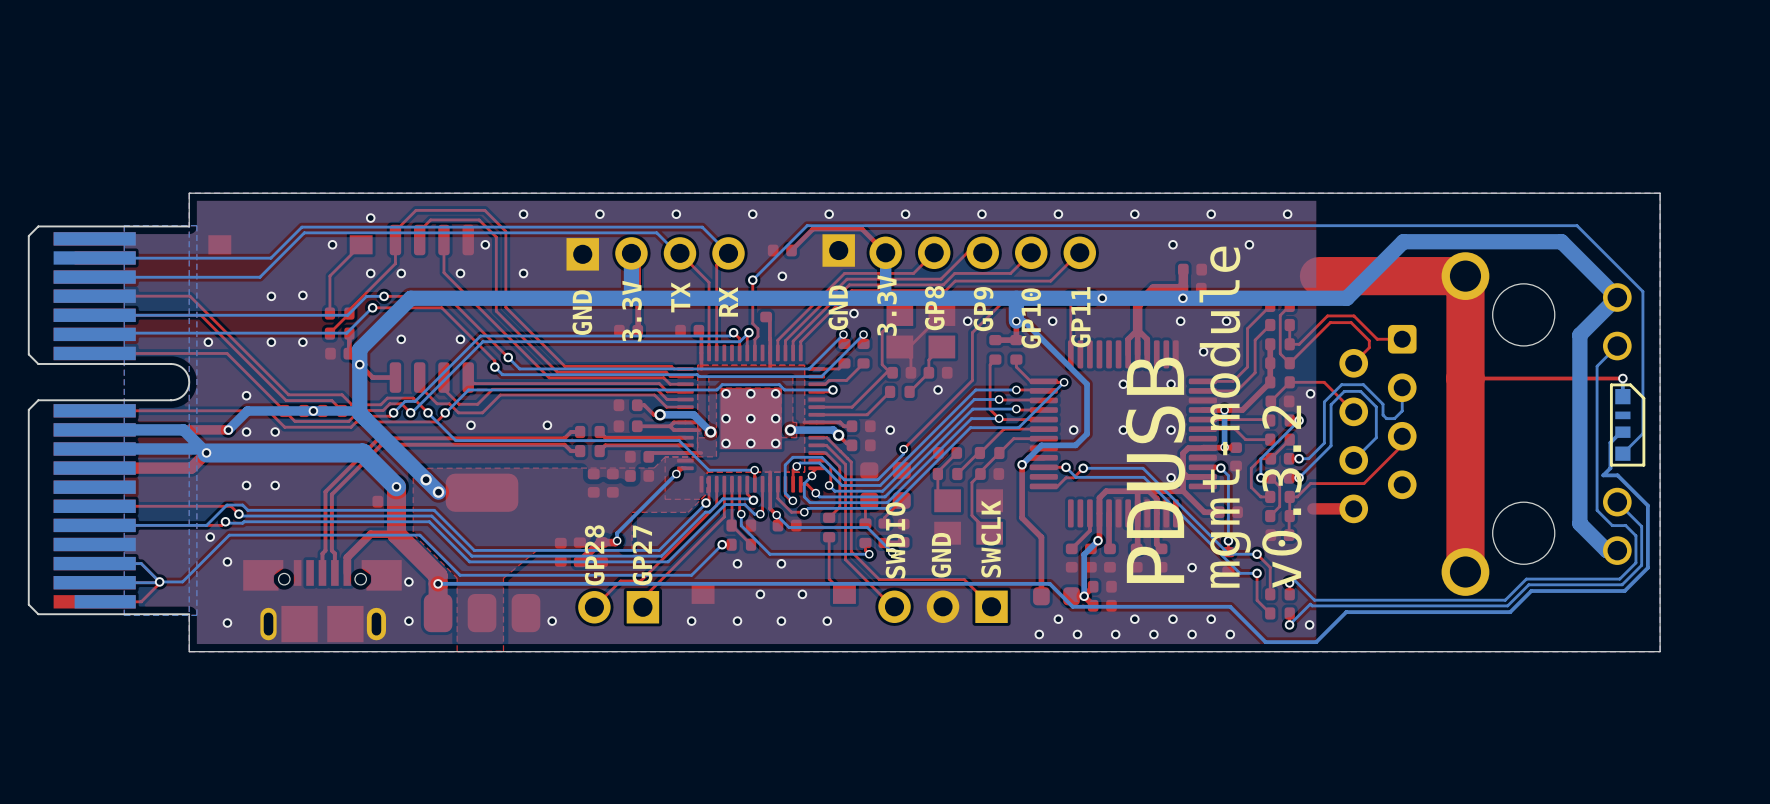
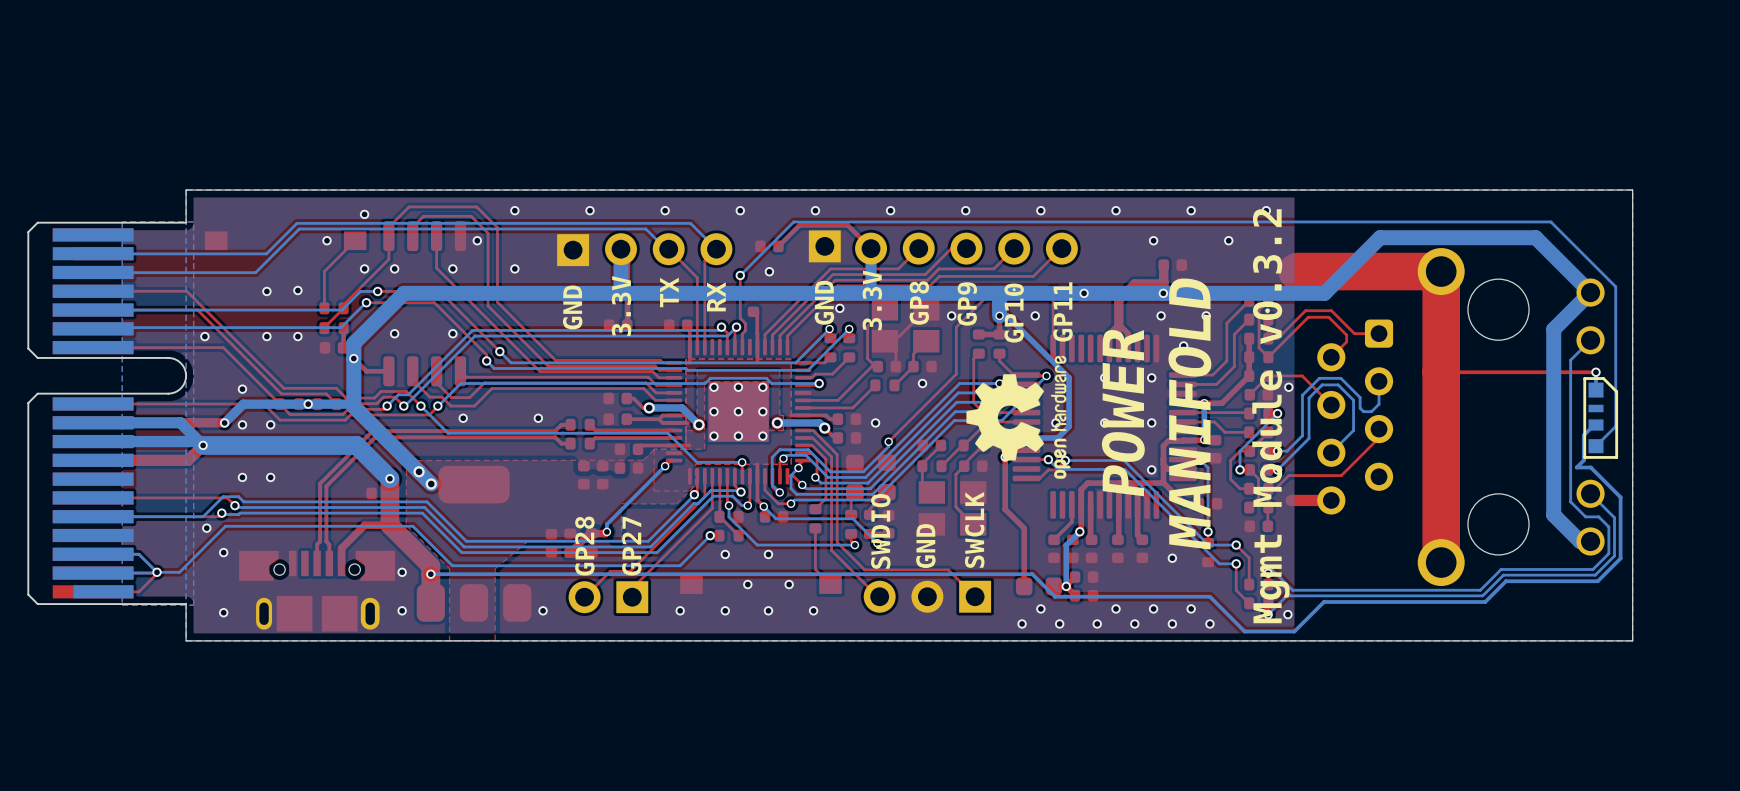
drawing: none -> [966, 355, 1071, 479]
text: mgmt-module (1225, 417) -> none
text: none -> POWER (1123, 412)
text: none -> MANIFOLD (1189, 413)
text: none -> Mgmt Module v0.3.2 (1270, 416)
text: PDUSB (1155, 470) -> none
text: v0.3.2 (1282, 496) -> none

